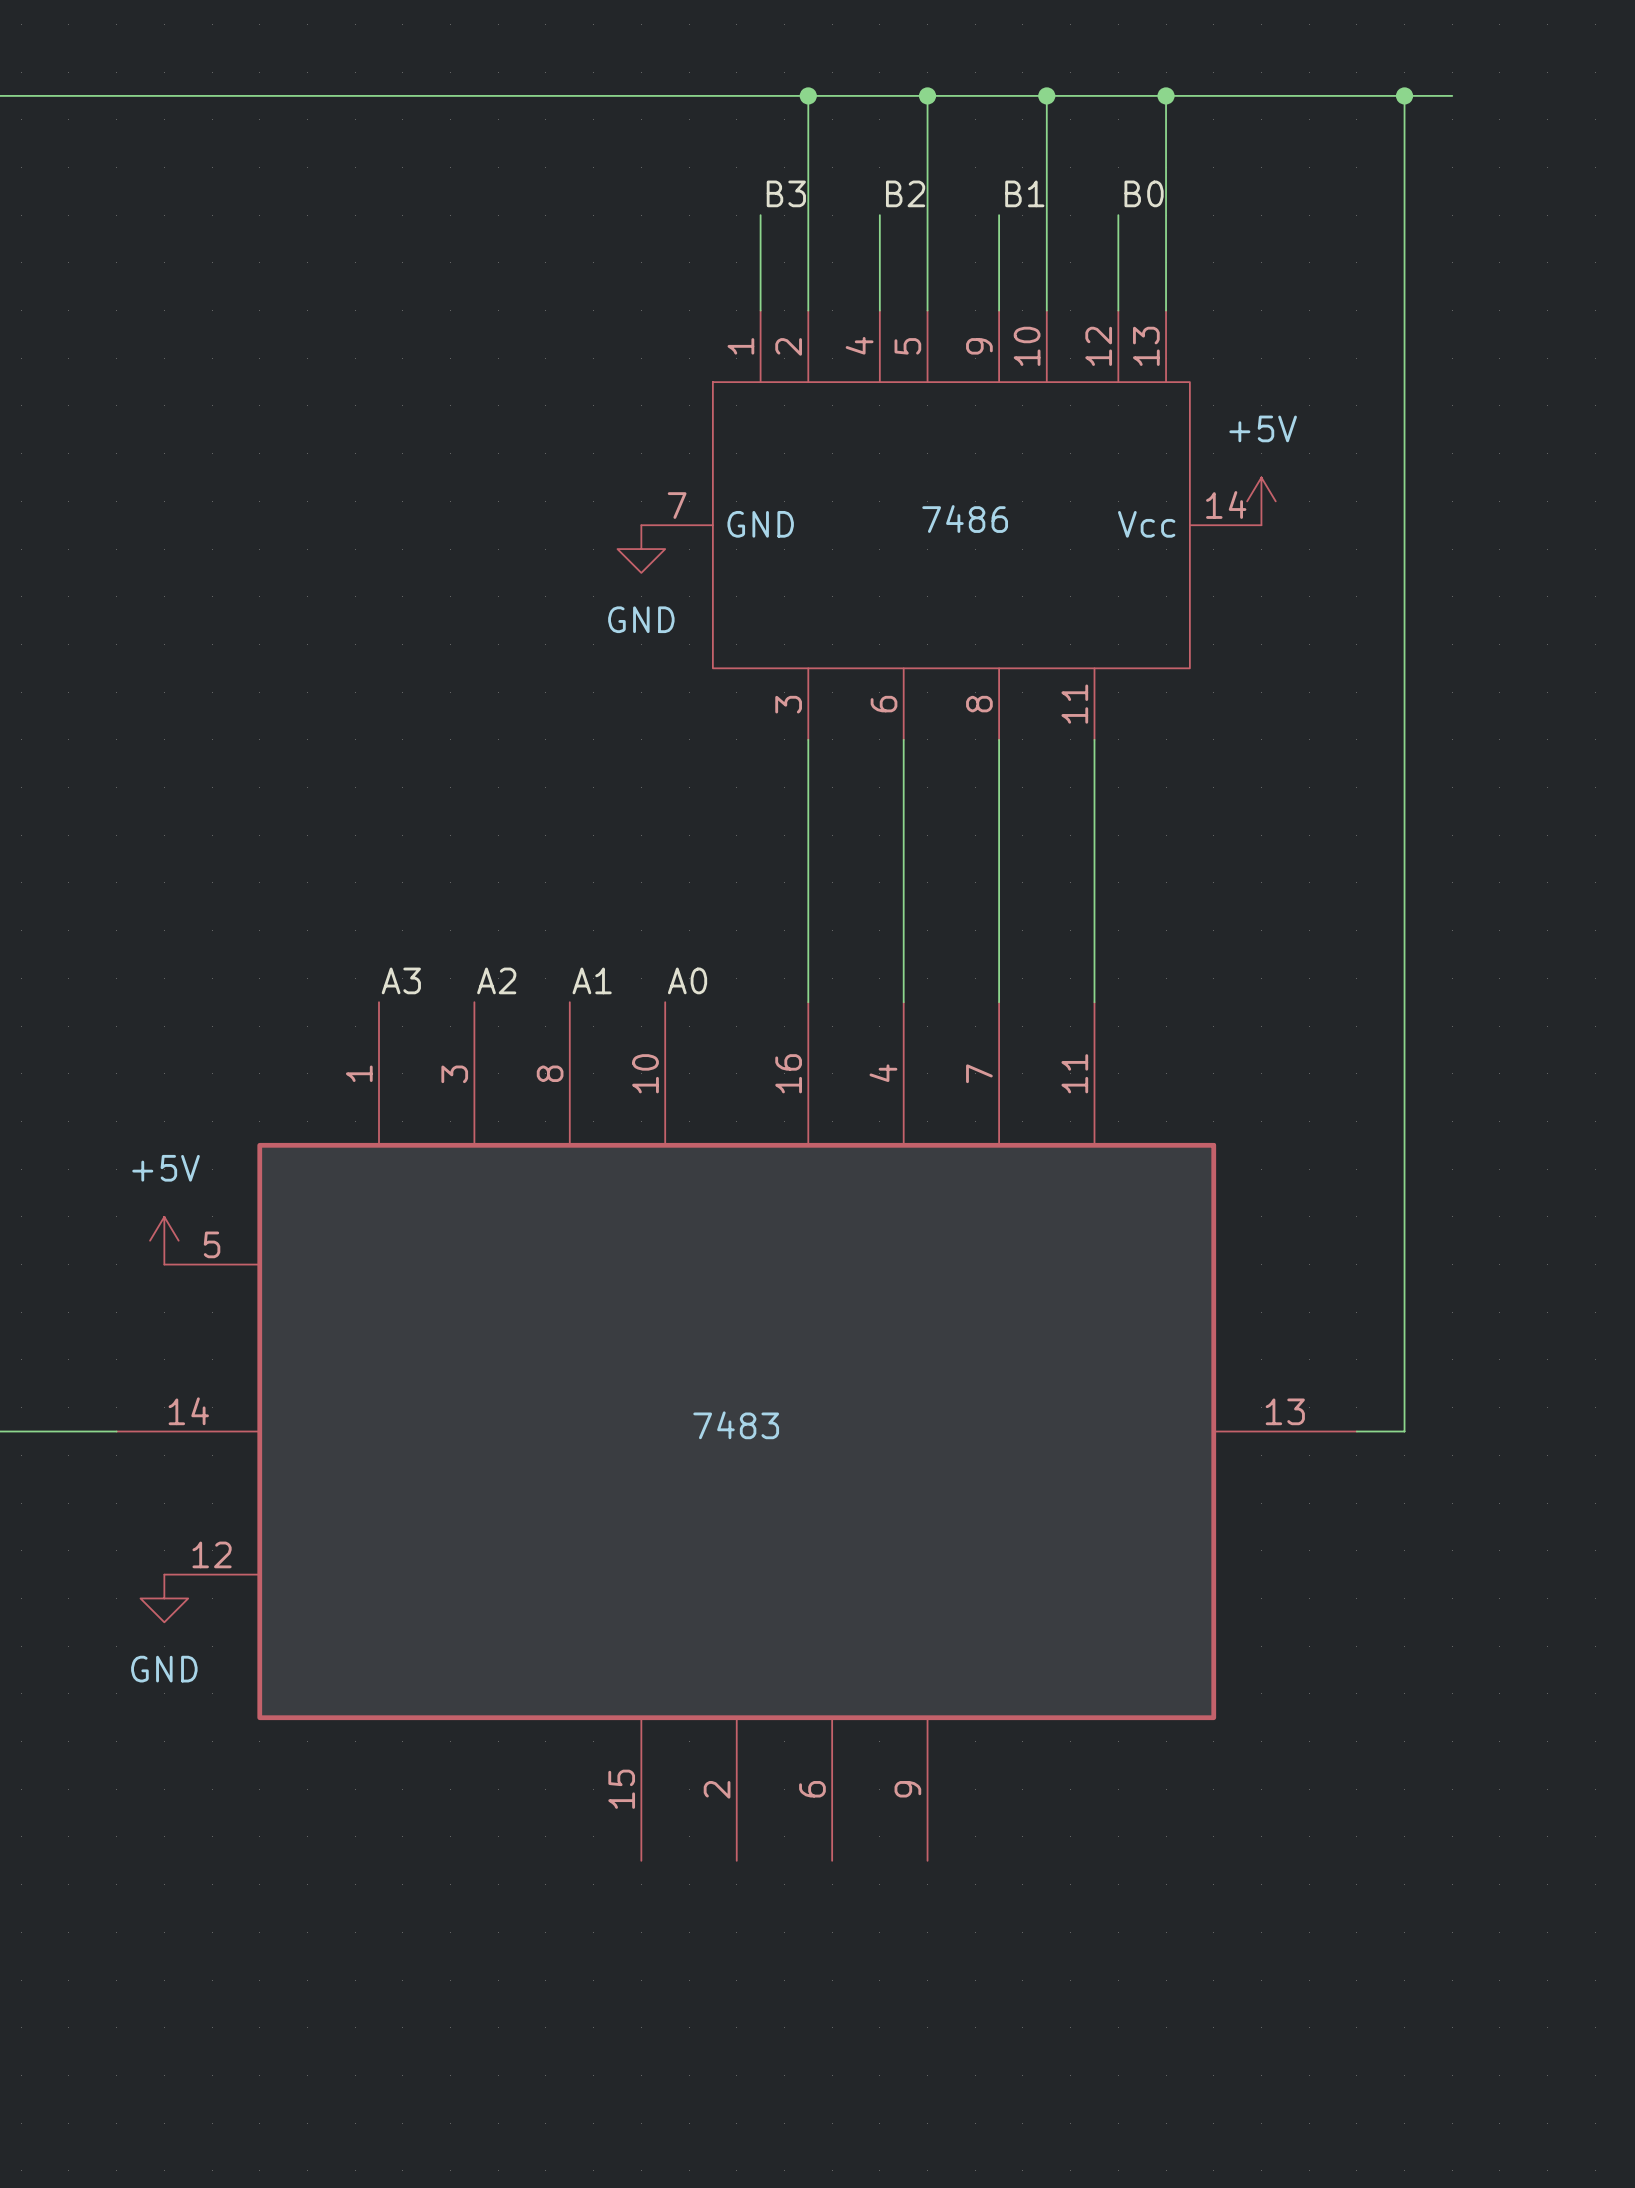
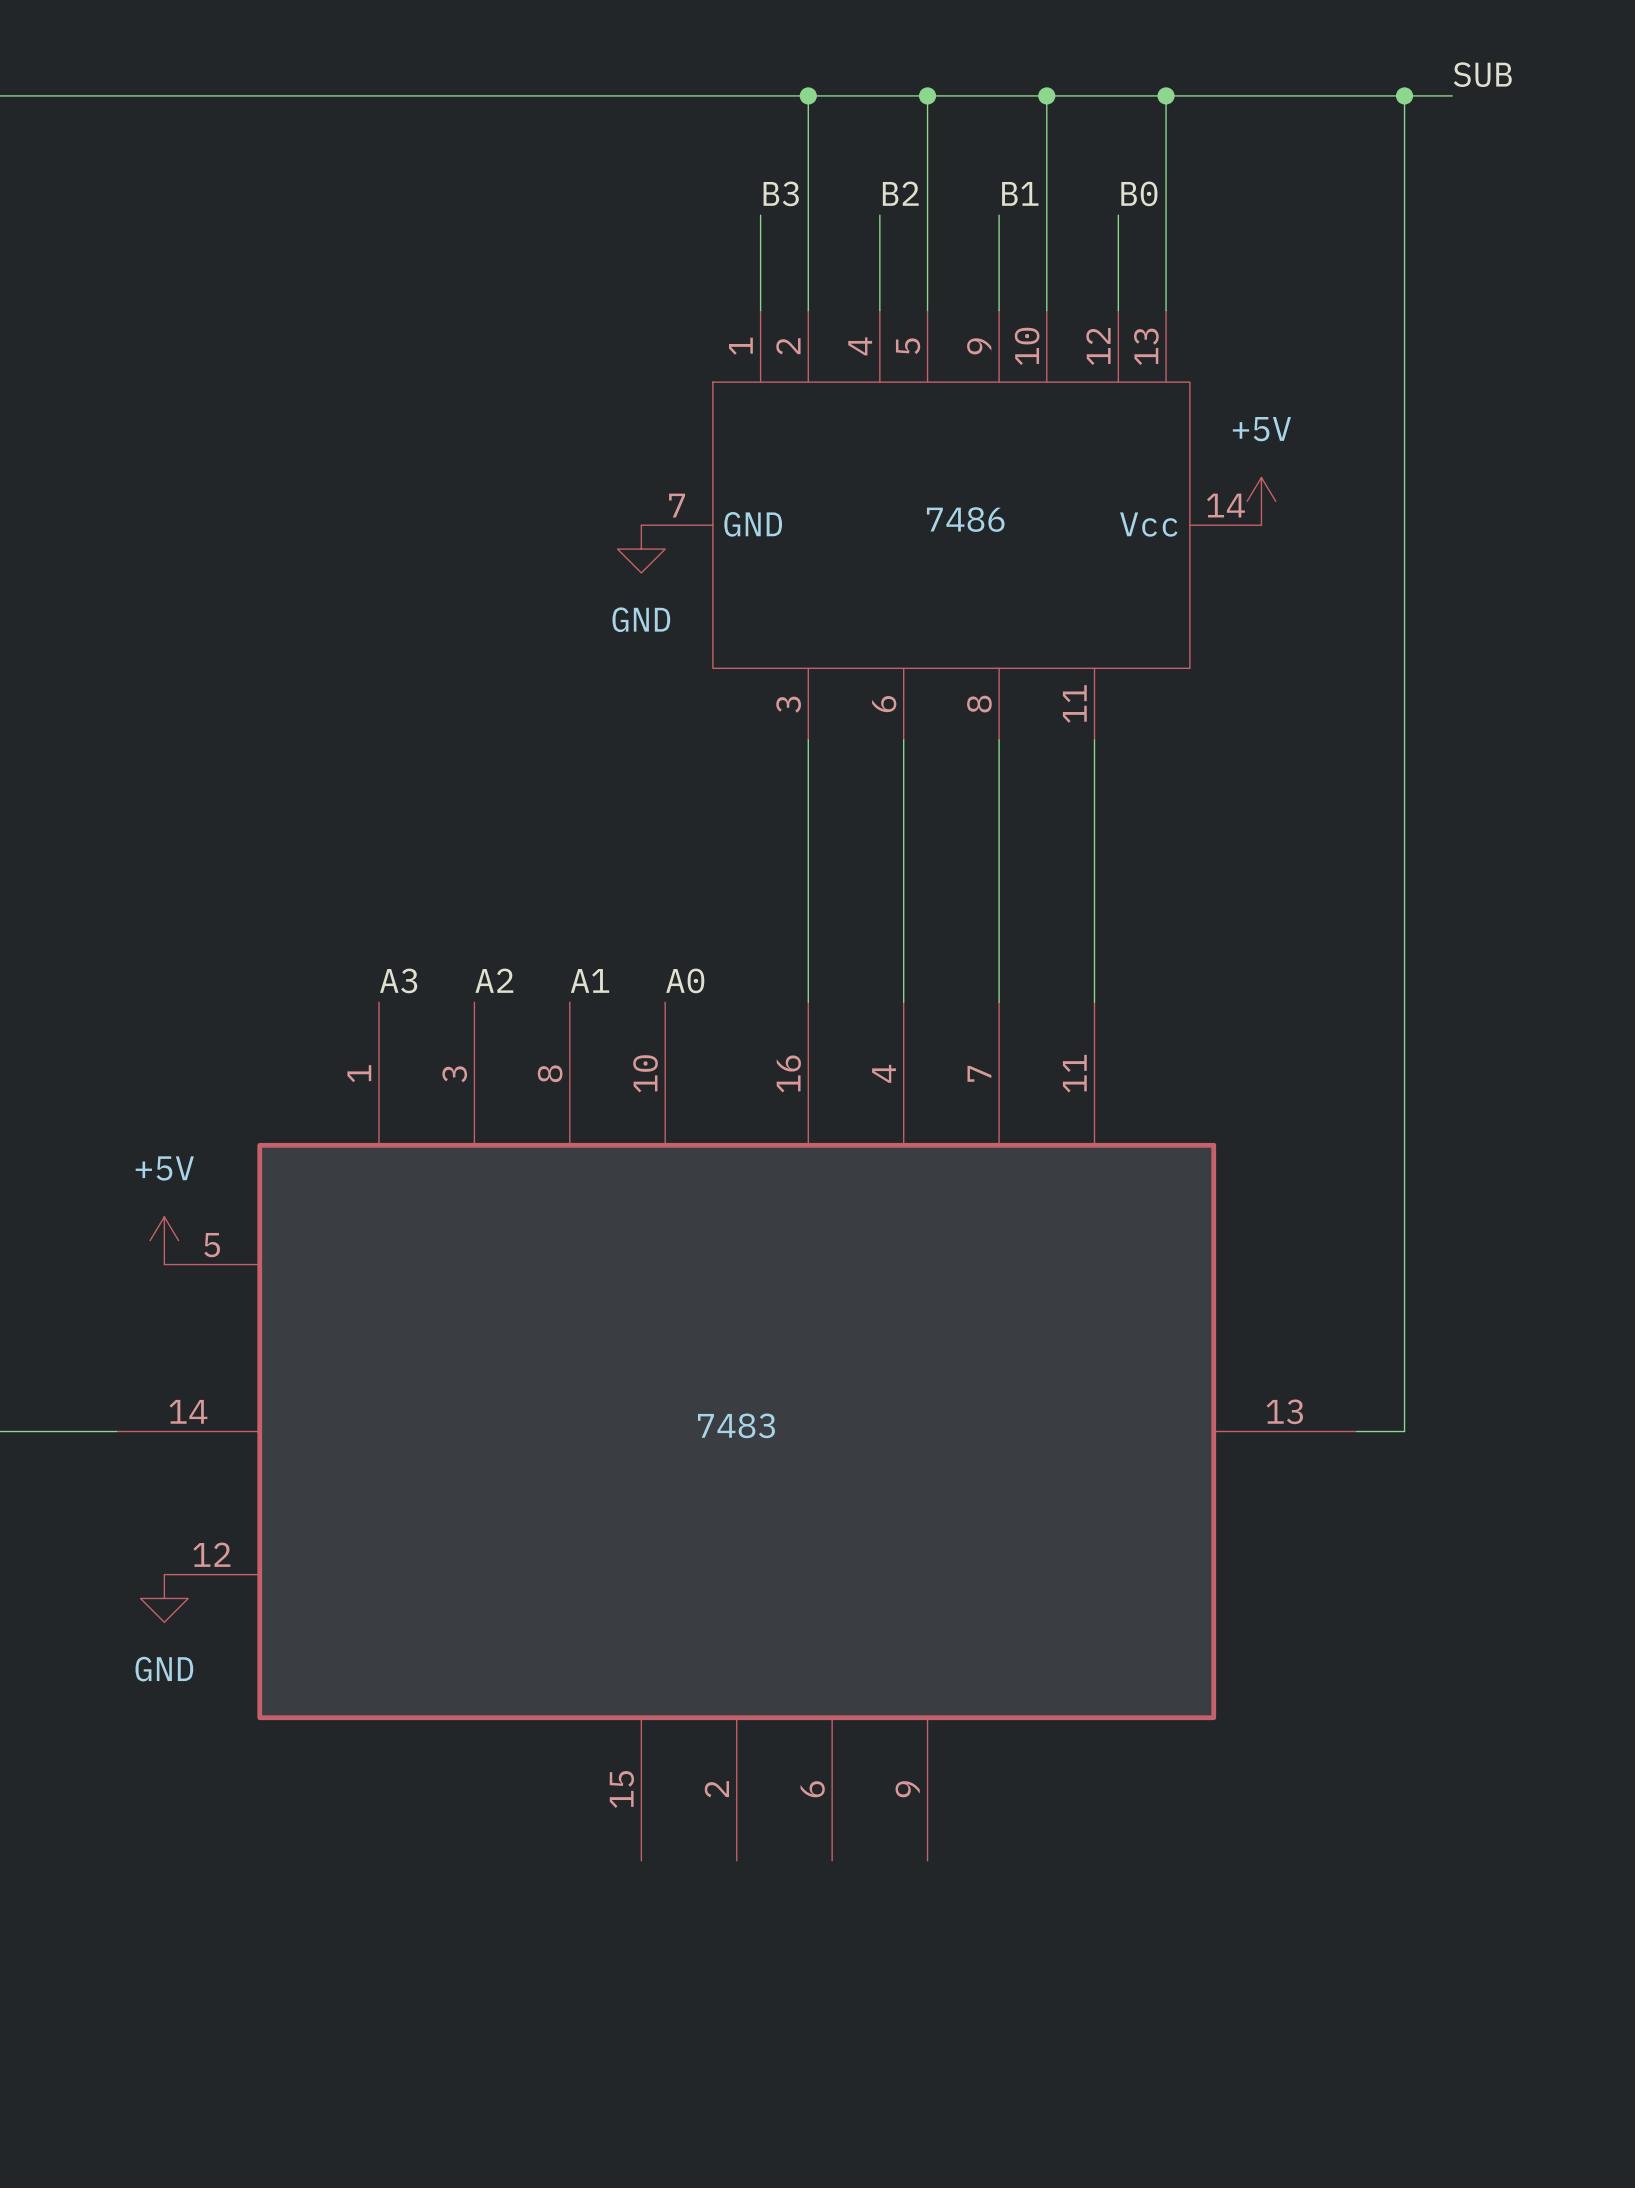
label: none -> SUB (1482, 74)

